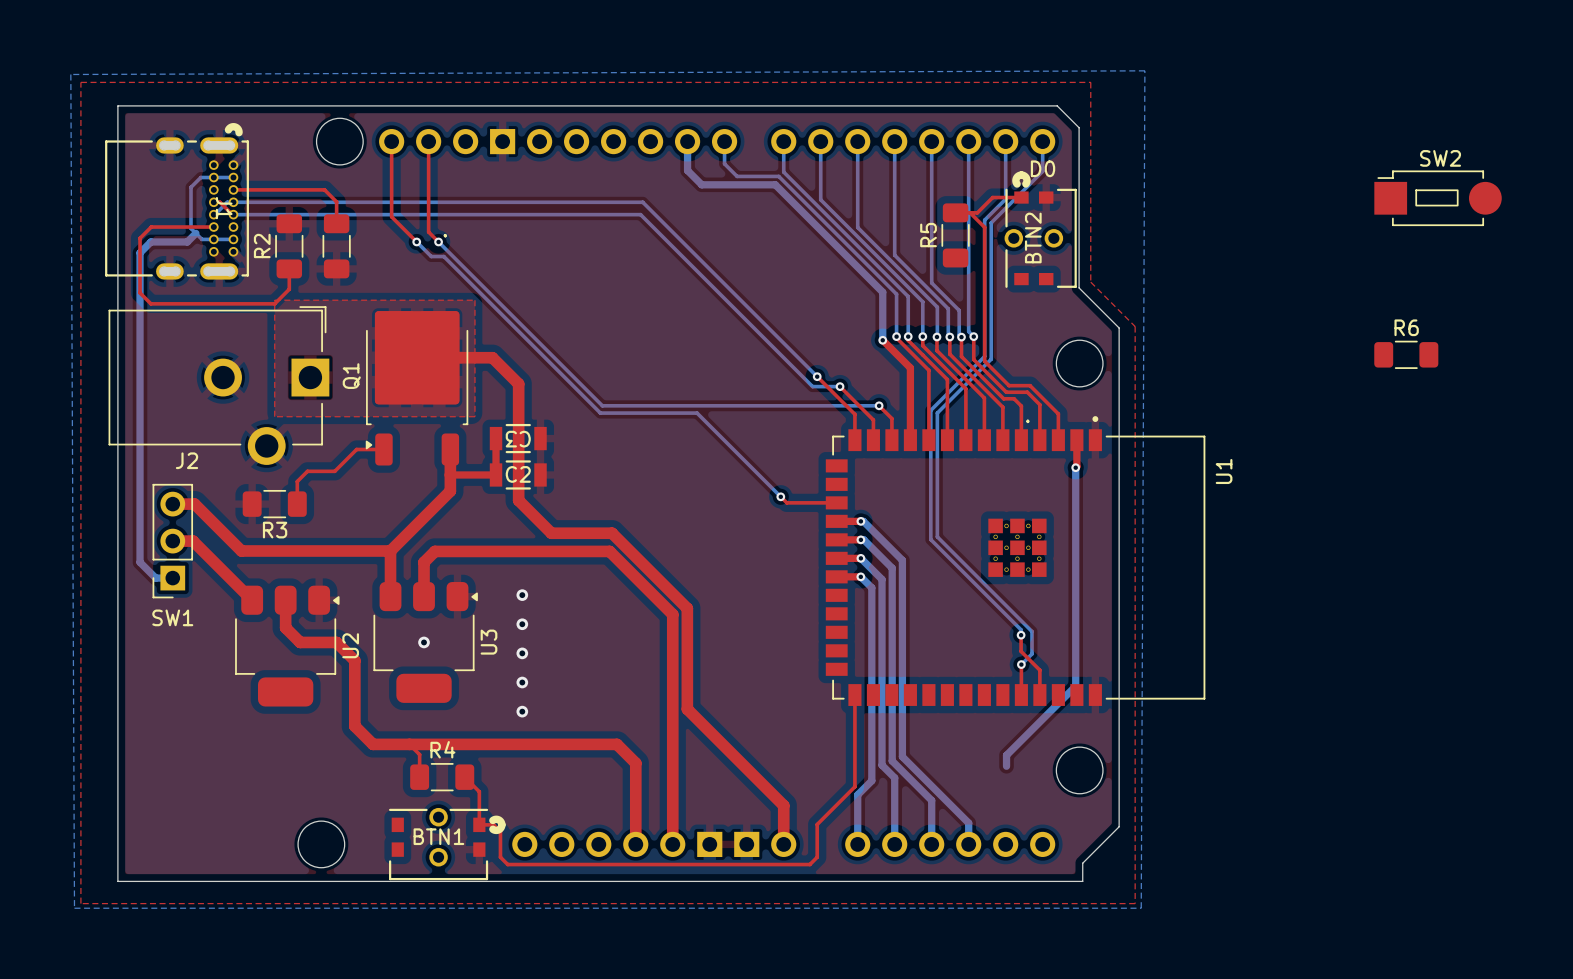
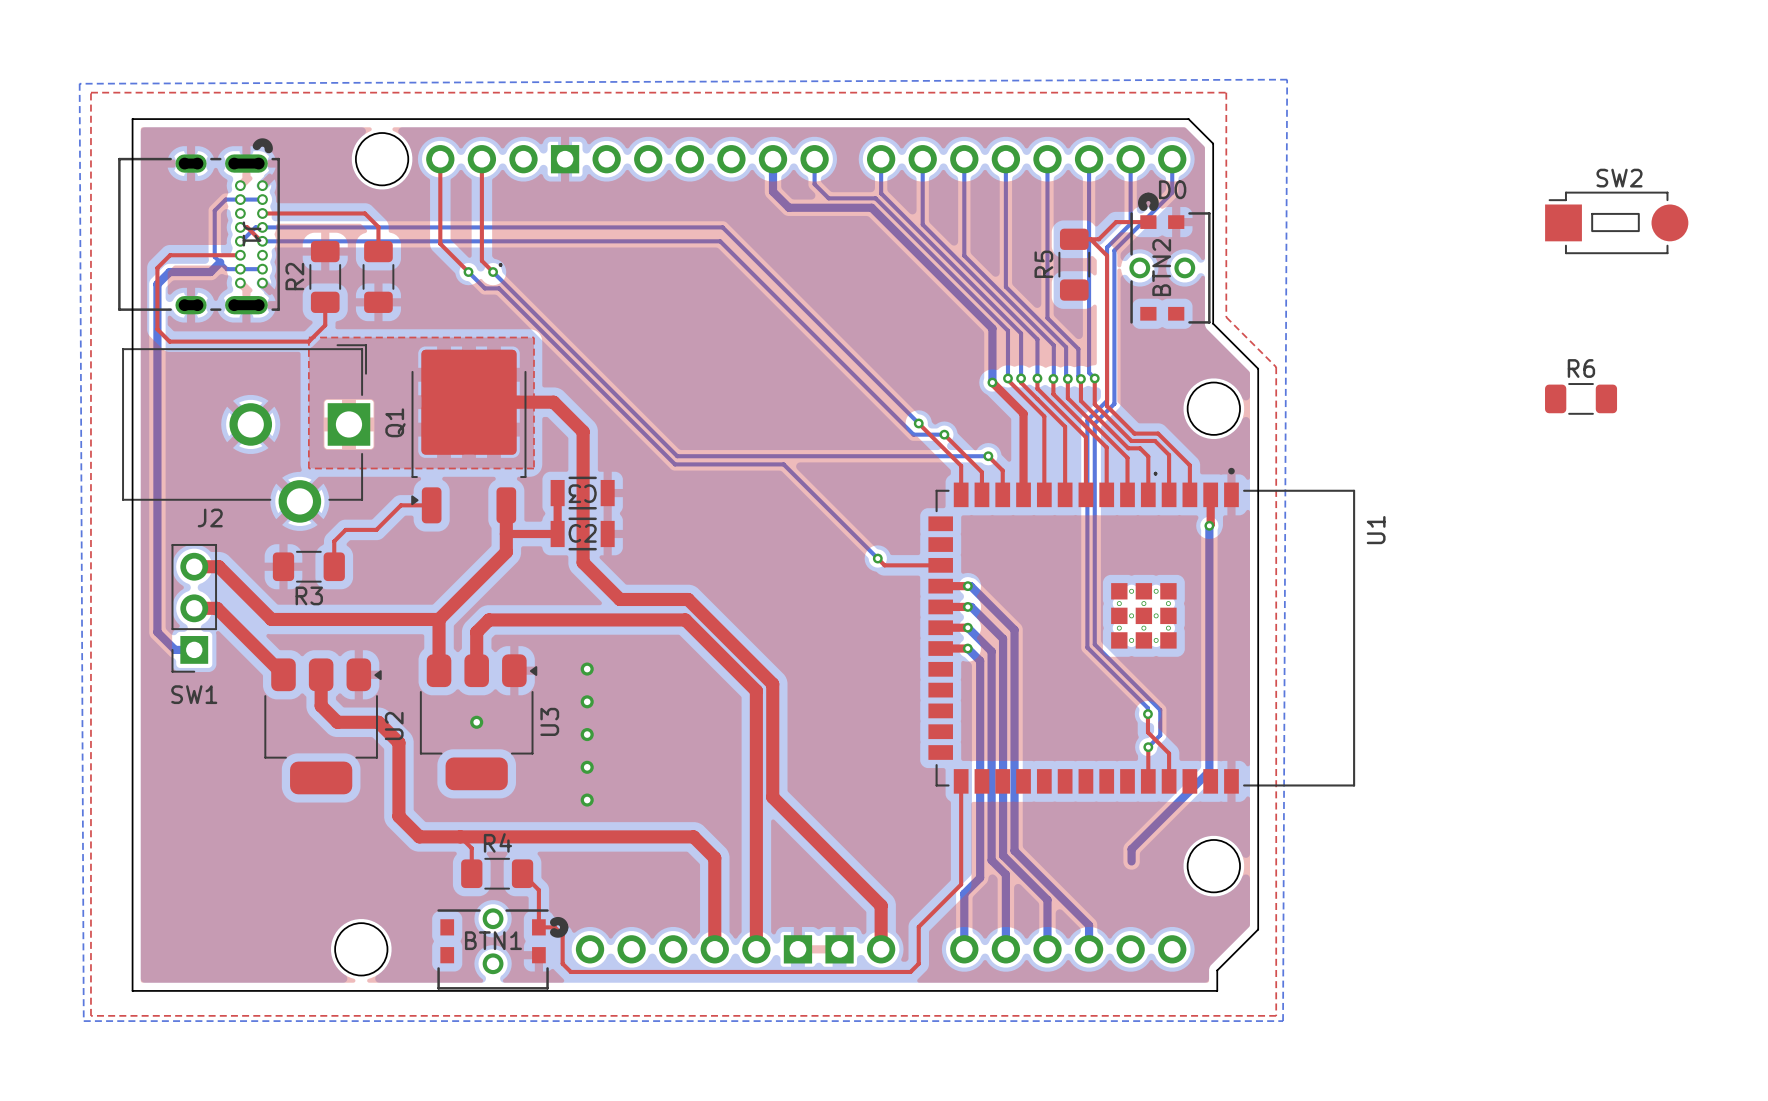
bottom track: (967, 373) (930, 410) (930, 539) (967, 575) -> (1087, 420) (1087, 647)
bottom track: (973, 376) (937, 413) (937, 536) (973, 573) -> (1094, 423) (1094, 644)

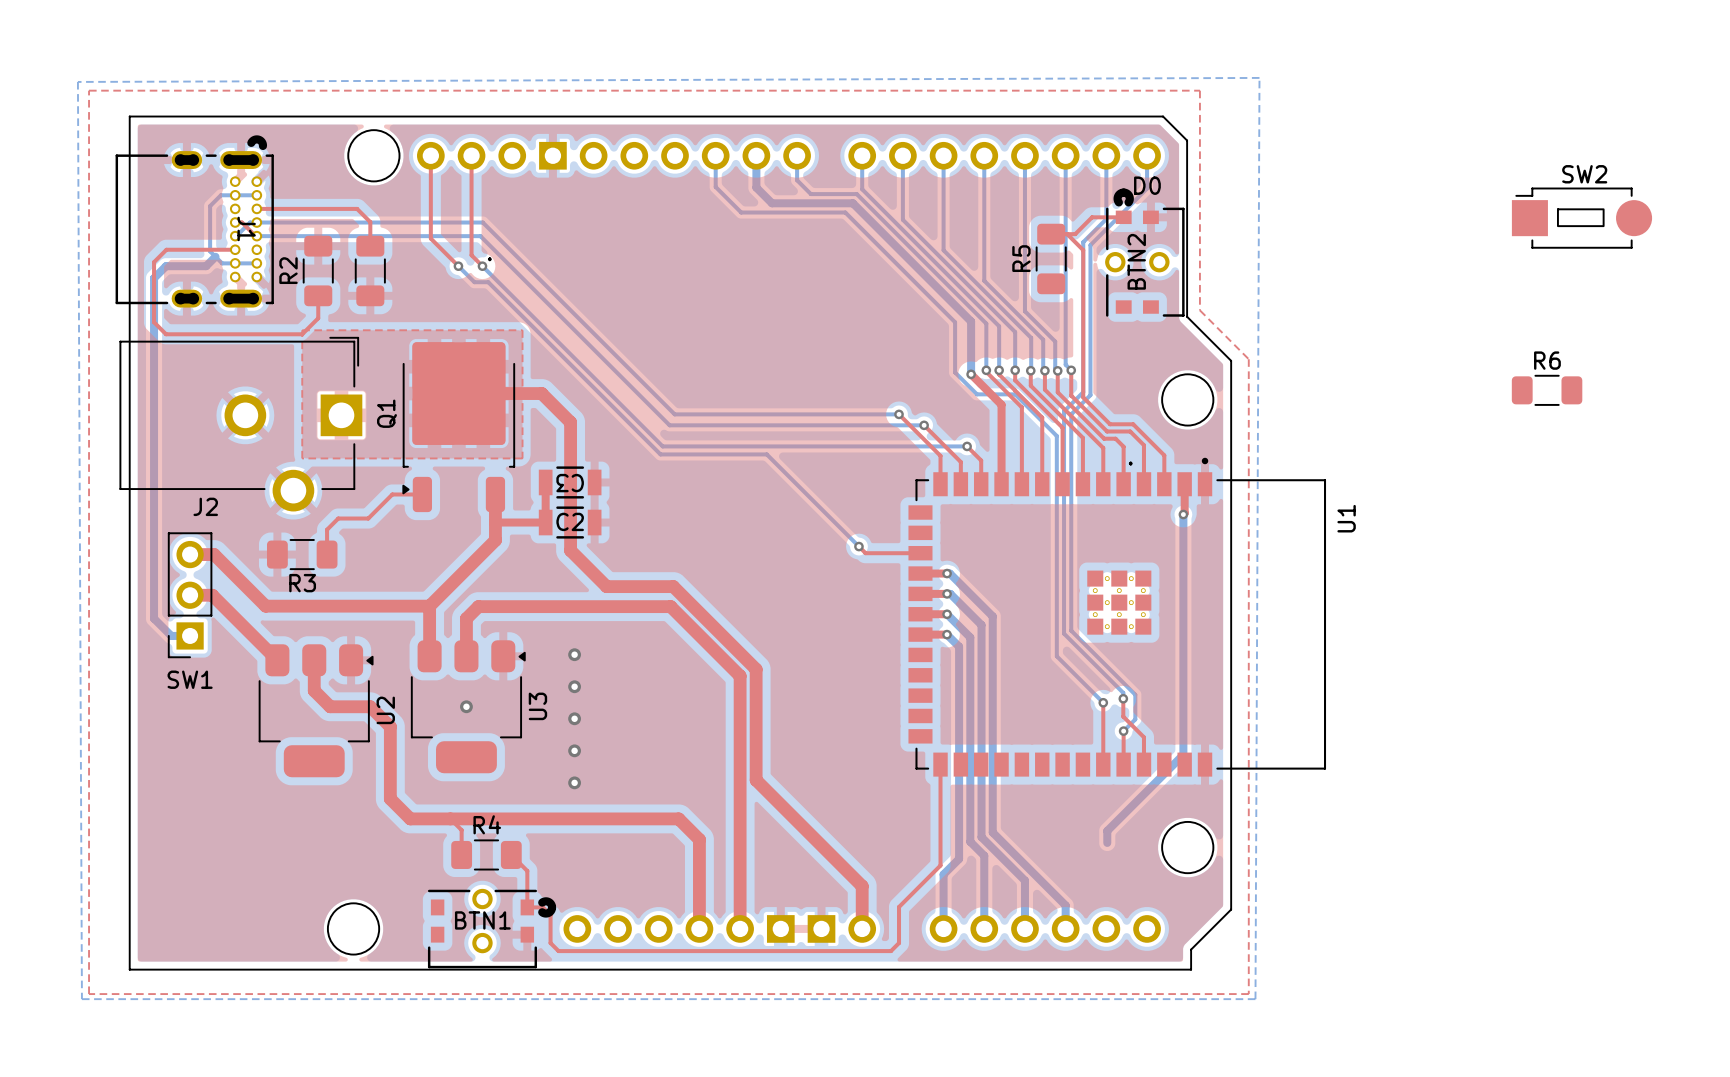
bottom track: none -> (715, 155) (715, 187) (741, 212) (845, 212) (955, 322) (955, 372) (976, 394) (1015, 394) (1056, 436) (1056, 656) (1103, 702)
bottom track: (493, 227) (722, 227) (918, 423) -> (482, 222) (674, 414) (899, 414)
bottom track: (491, 241) (720, 241) (913, 434) -> (480, 236) (669, 425) (893, 425)
top track: none -> (1103, 702) (1103, 764)
via: none -> (1103, 702)

